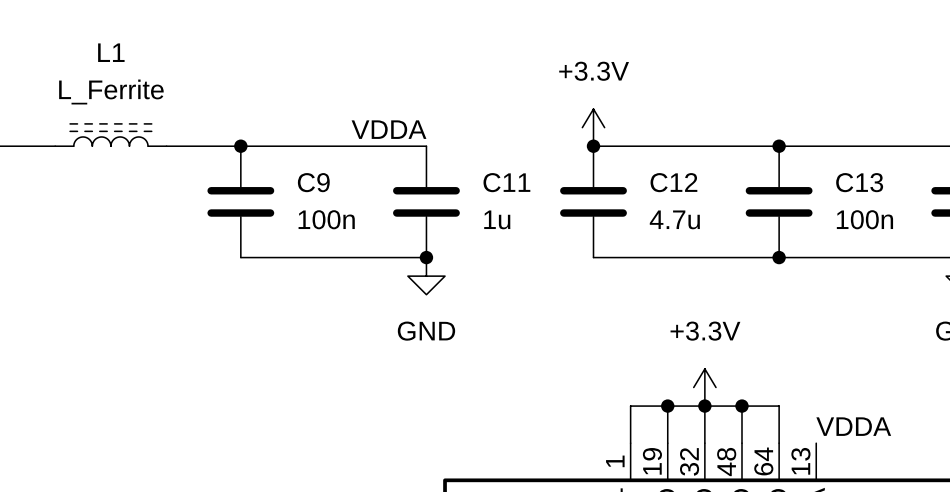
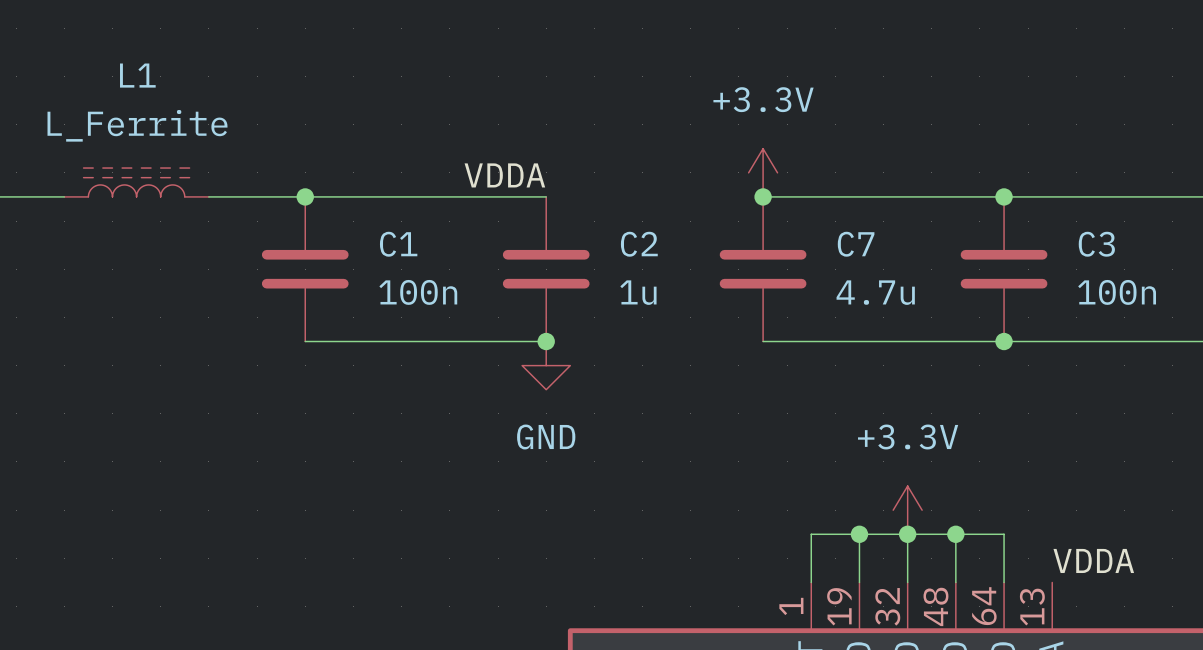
C9 name: C9 (313, 182) -> C1 (398, 244)
C11 name: C11 (506, 182) -> C2 (639, 244)
C12 name: C12 (673, 182) -> C7 (856, 244)
C13 name: C13 (859, 182) -> C3 (1096, 244)

